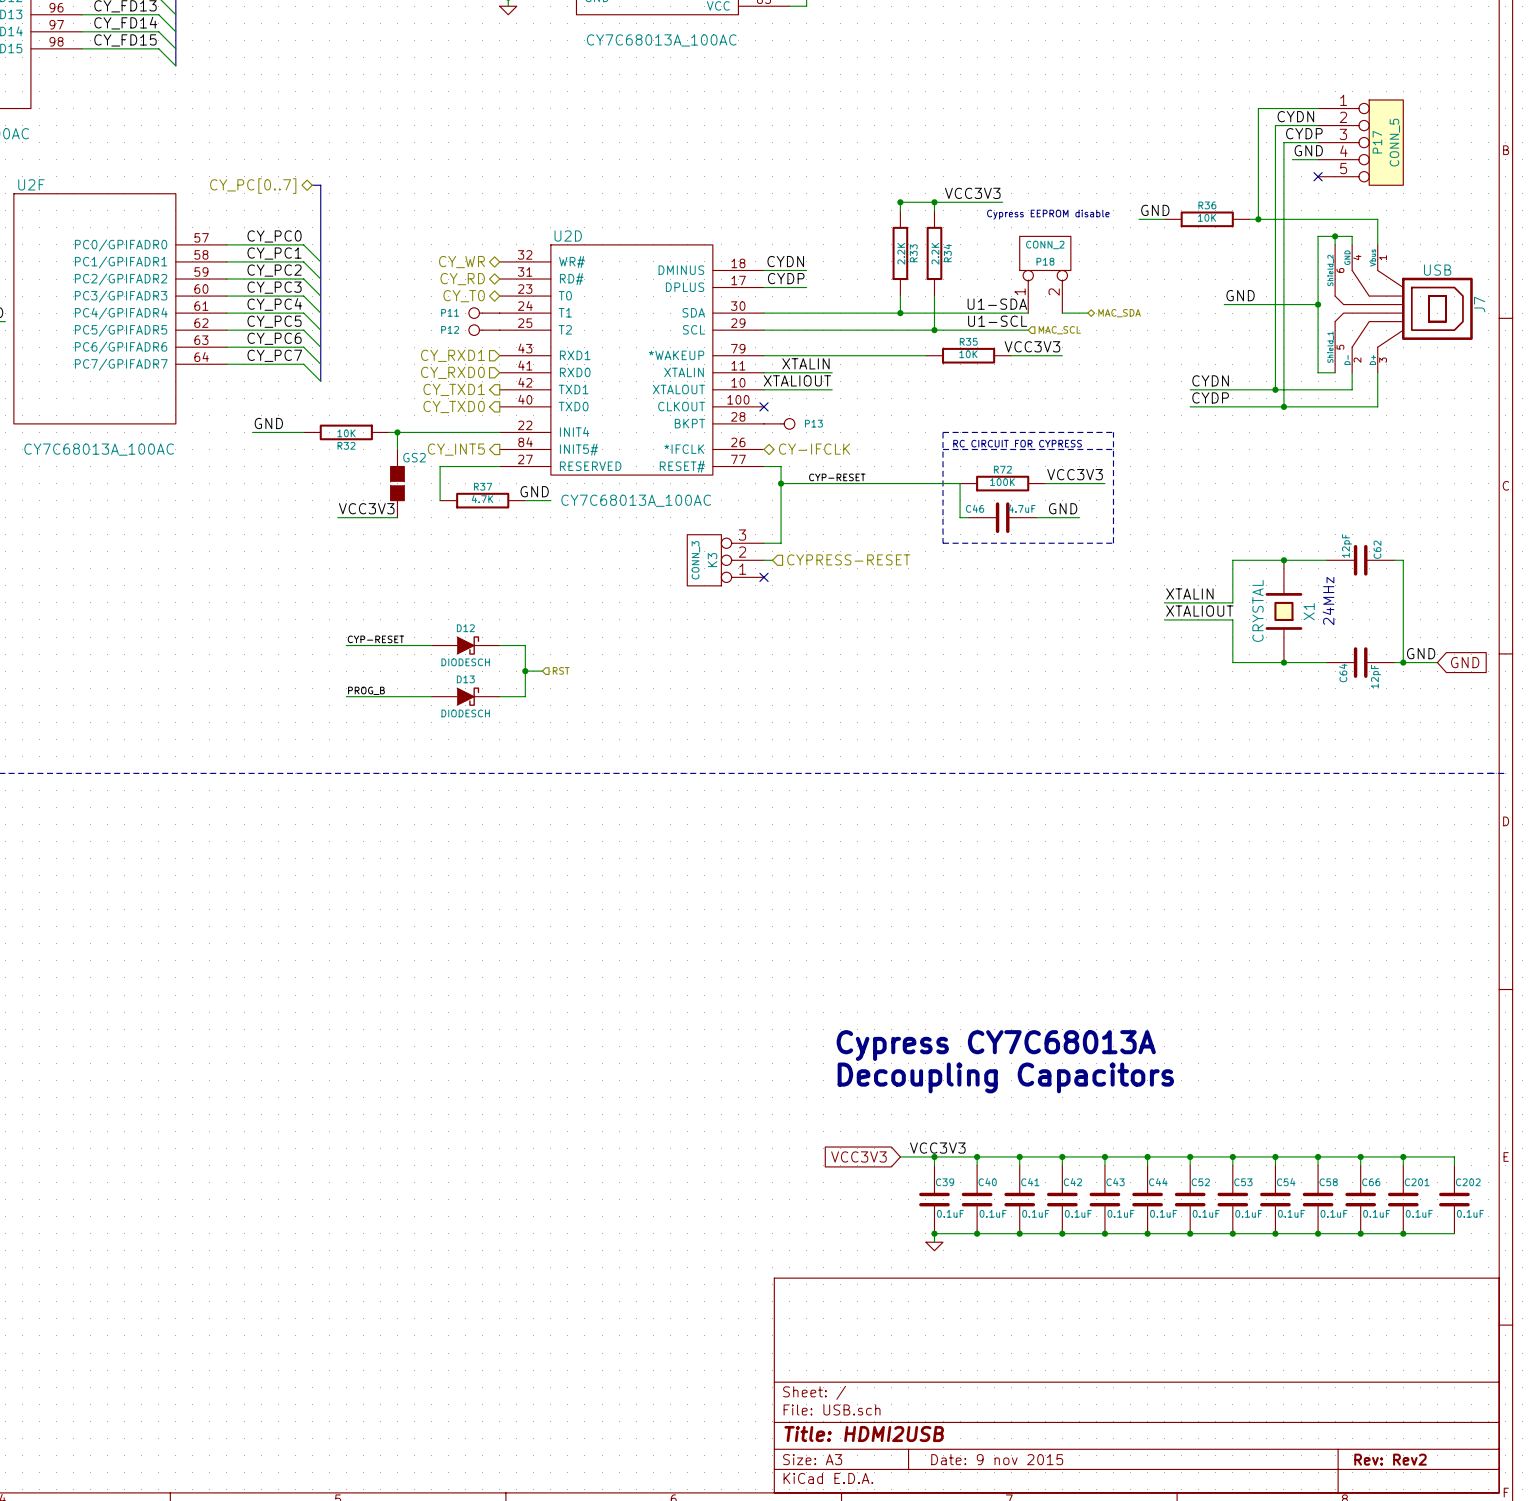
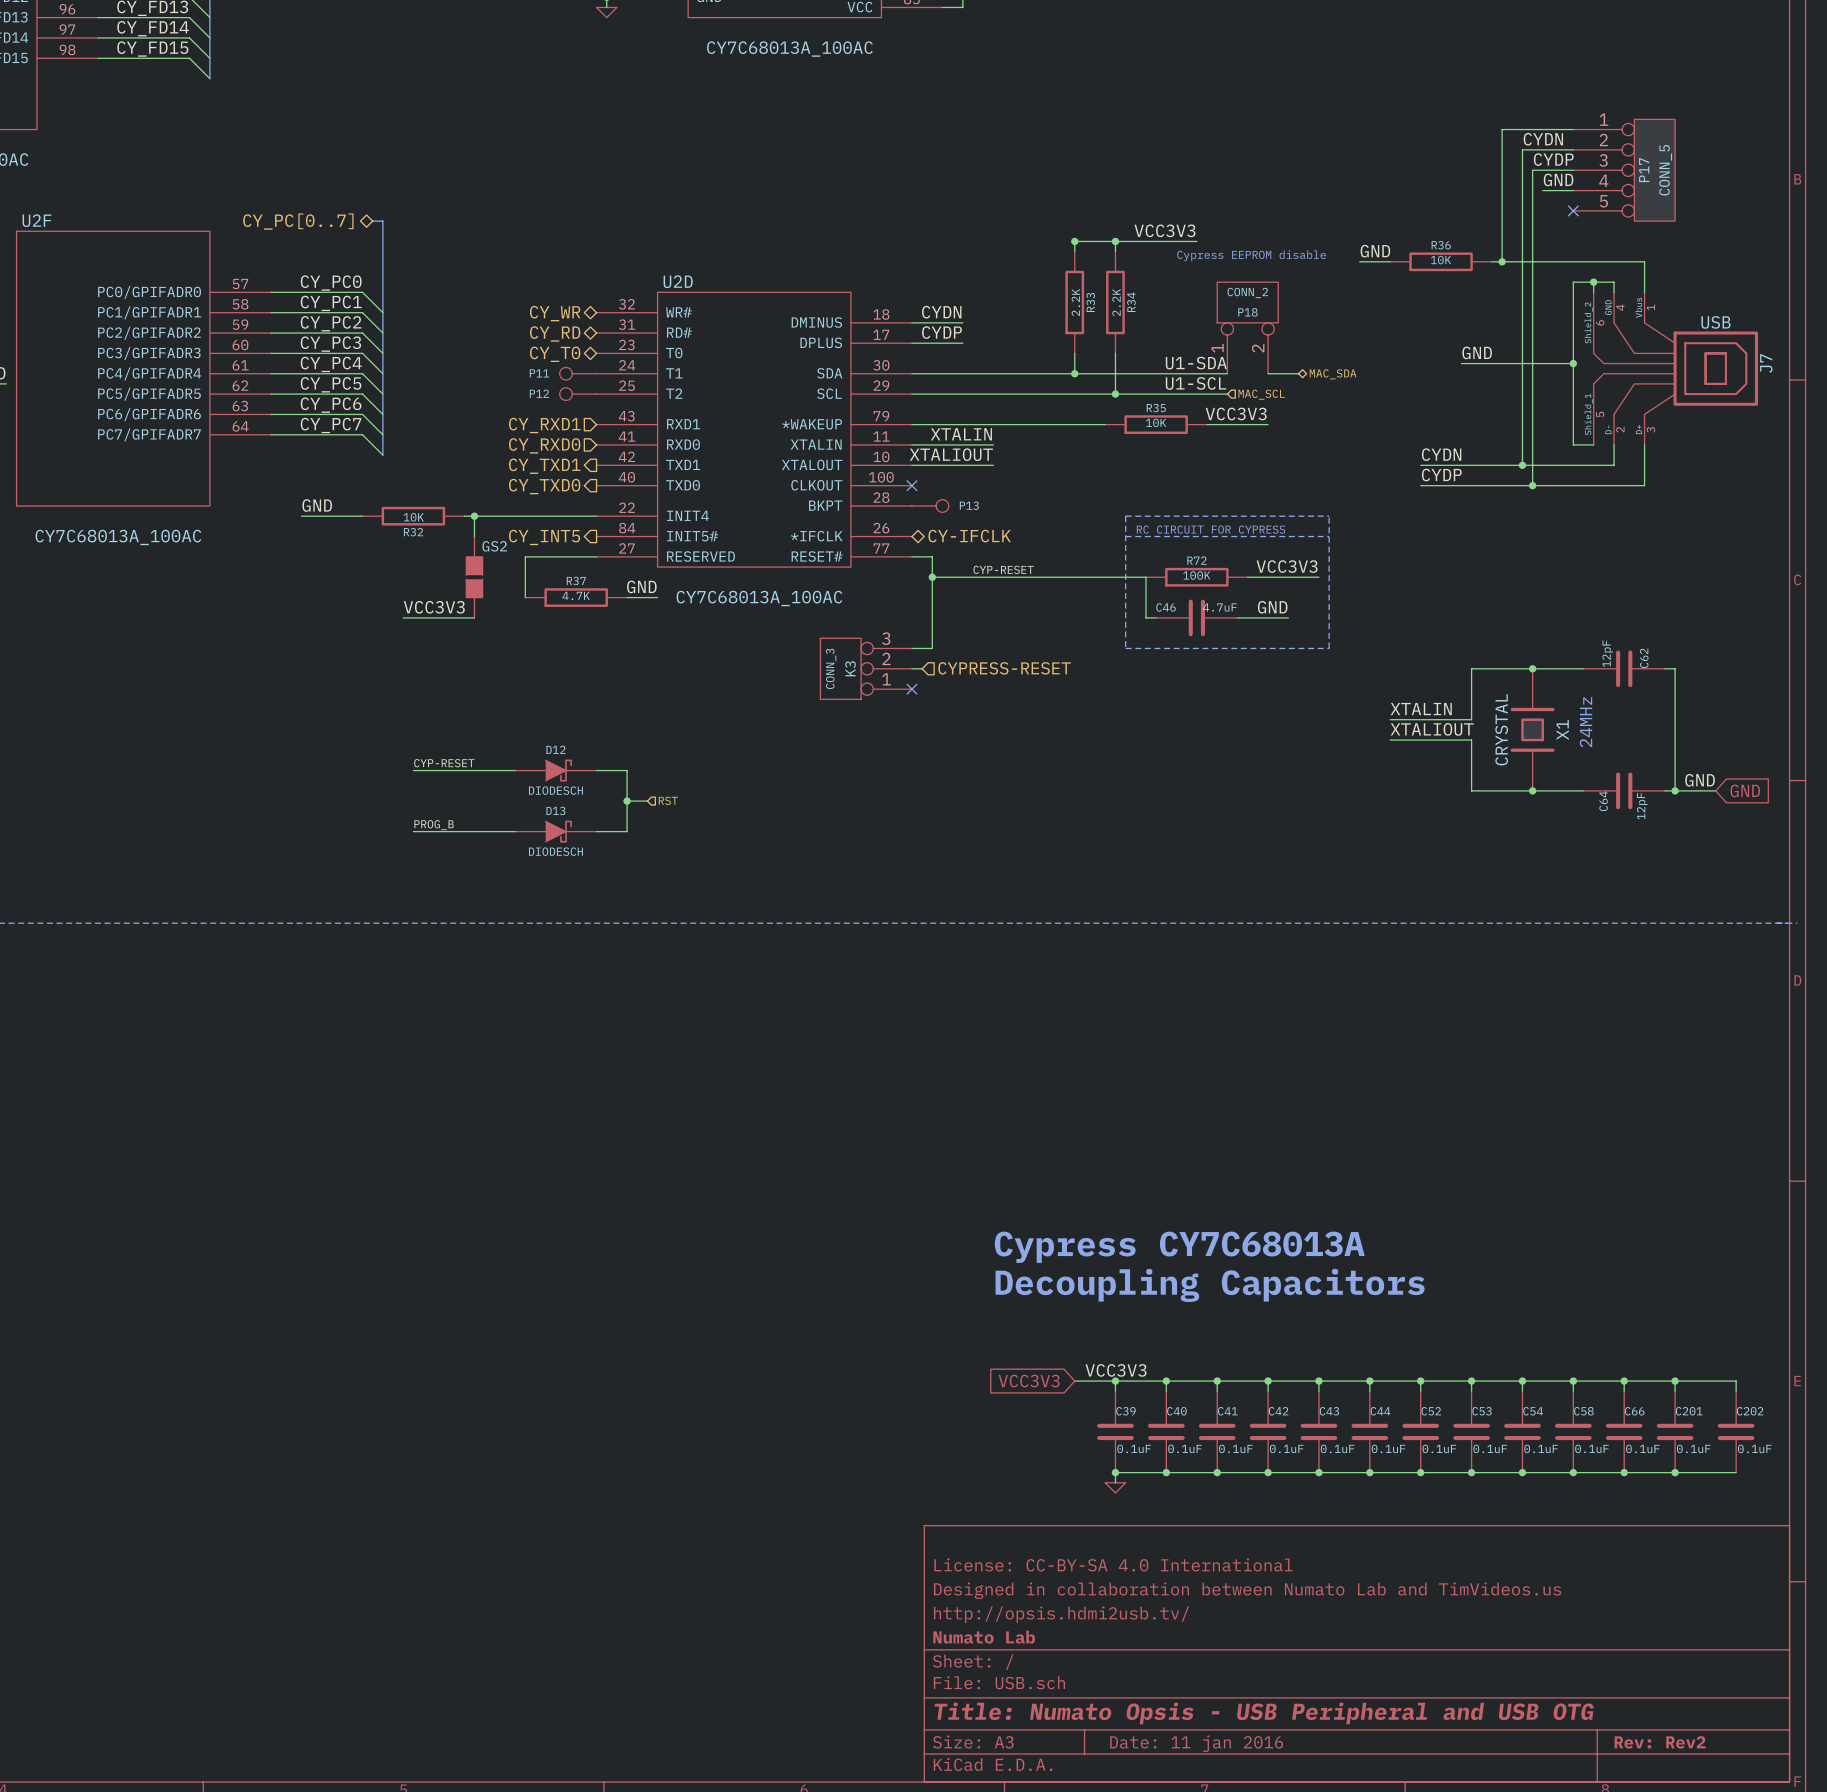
title block: none -> License: CC-BY-SA 4.0 International (1113, 1564)
title block: none -> Designed in collaboration between Numato Lab and TimVideos.us (1247, 1590)
title block: none -> http://opsis.hdmi2usb.tv/ (1061, 1614)
title block: none -> Numato Lab (984, 1637)
title block: Title: HDMI2USB (864, 1434) -> Title: Numato Opsis - USB Peripheral and USB OTG (1264, 1713)
title block: Date: 9 nov 2015 (997, 1459) -> Date: 11 jan 2016 (1196, 1743)

